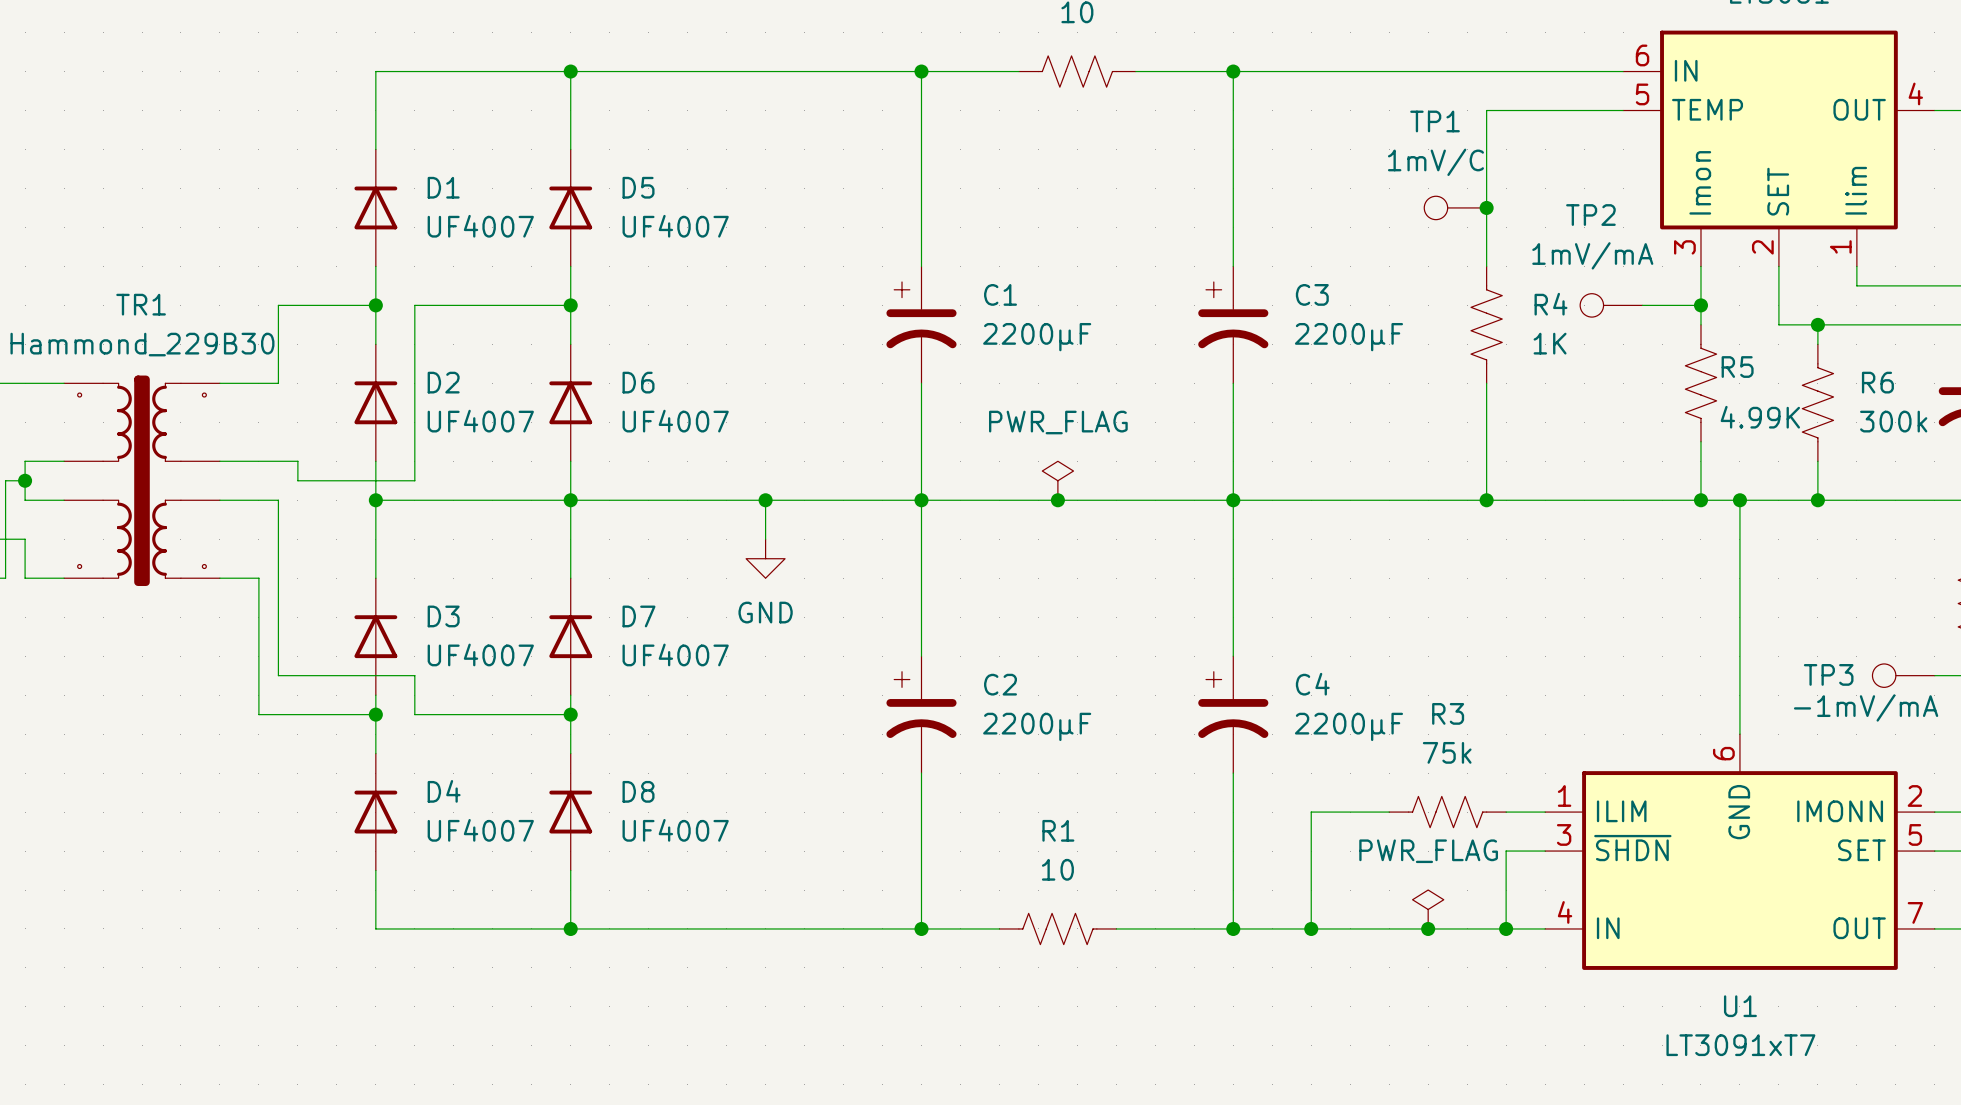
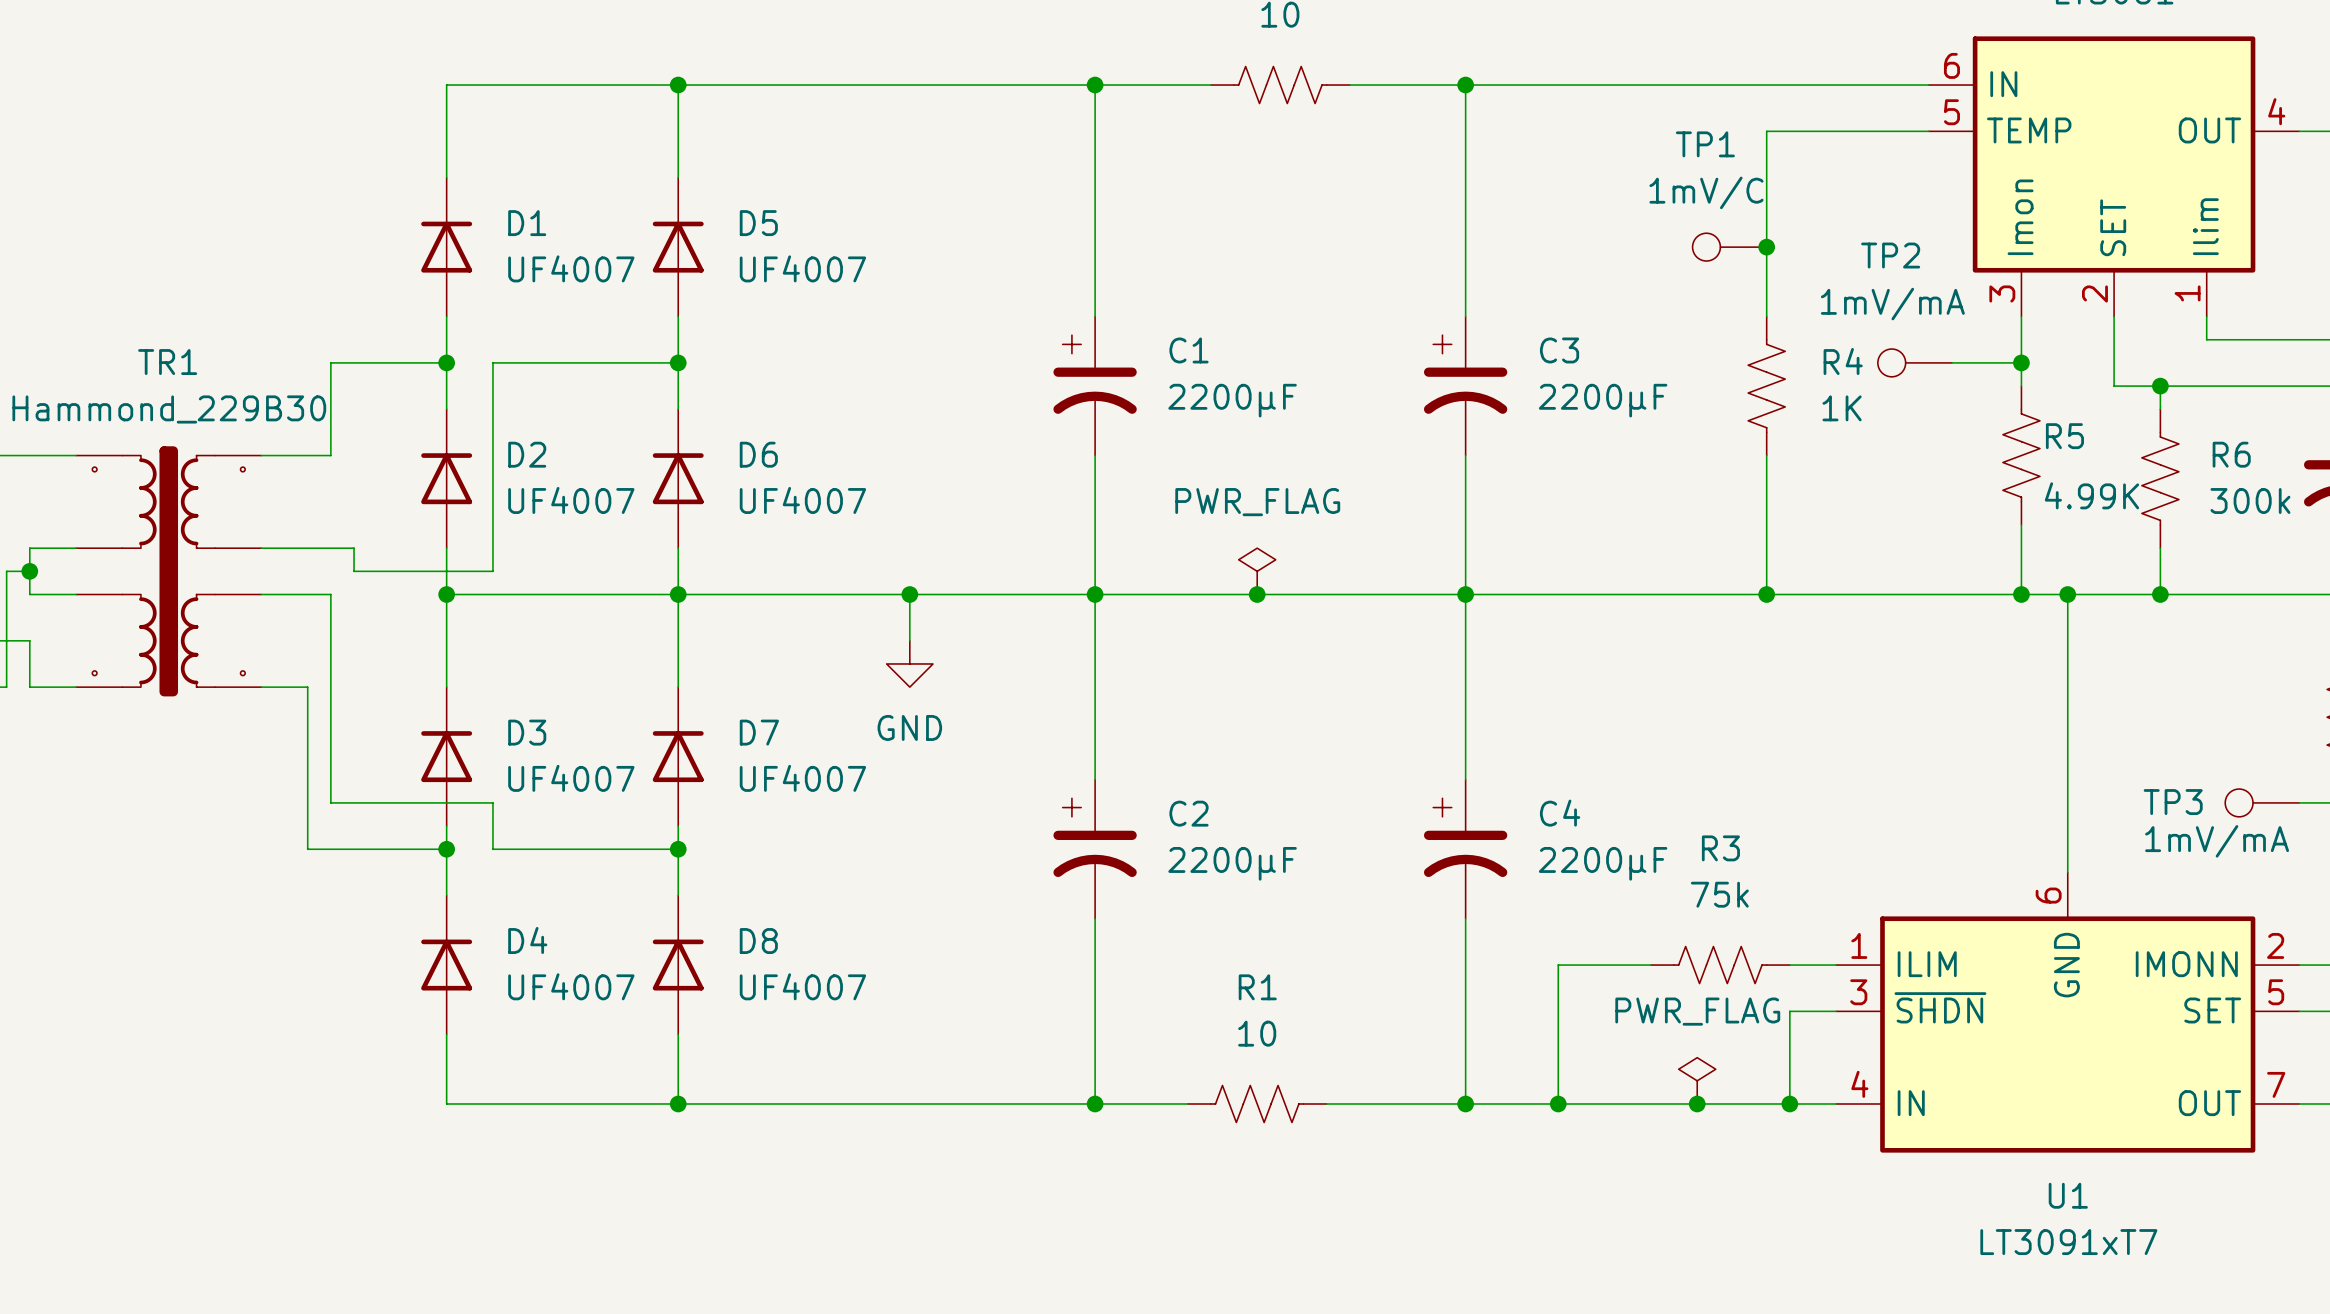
TP3 value: -1mV/mA (1866, 707) -> 1mV/mA (2217, 841)

